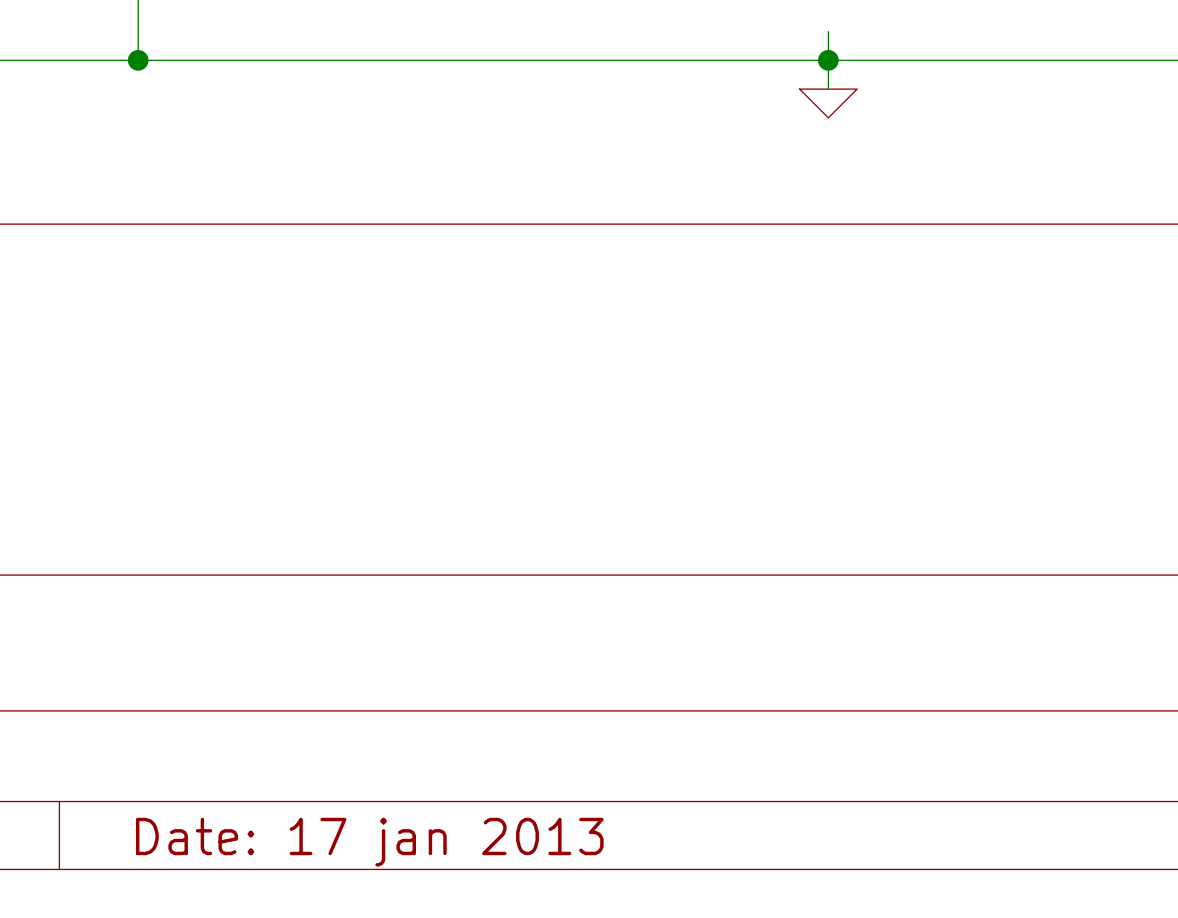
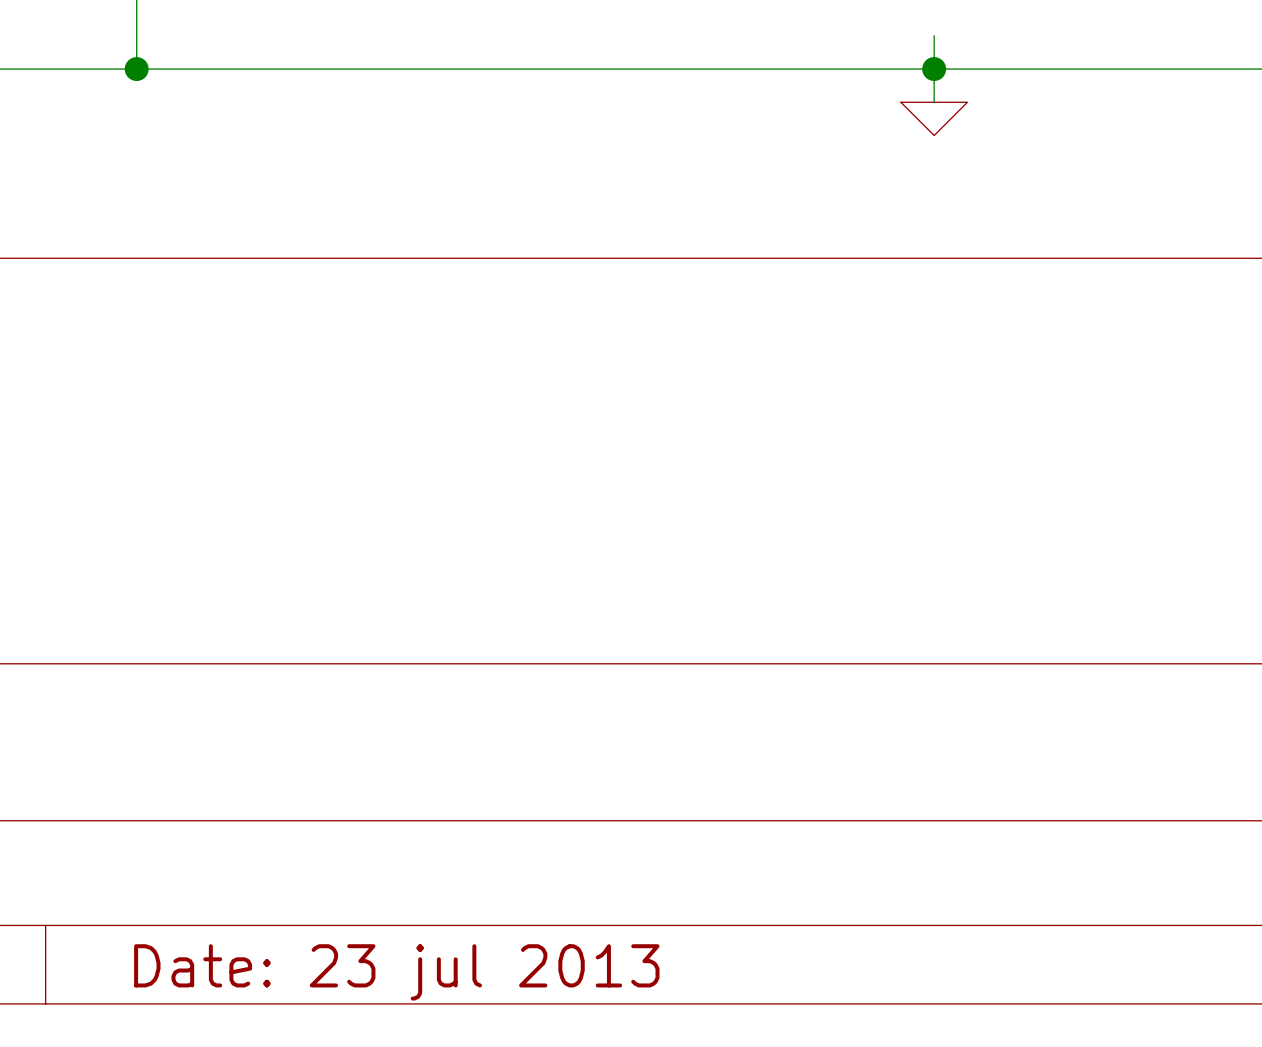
title block: Date: 17 jan 2013 (369, 842) -> Date: 23 jul 2013 (396, 972)

